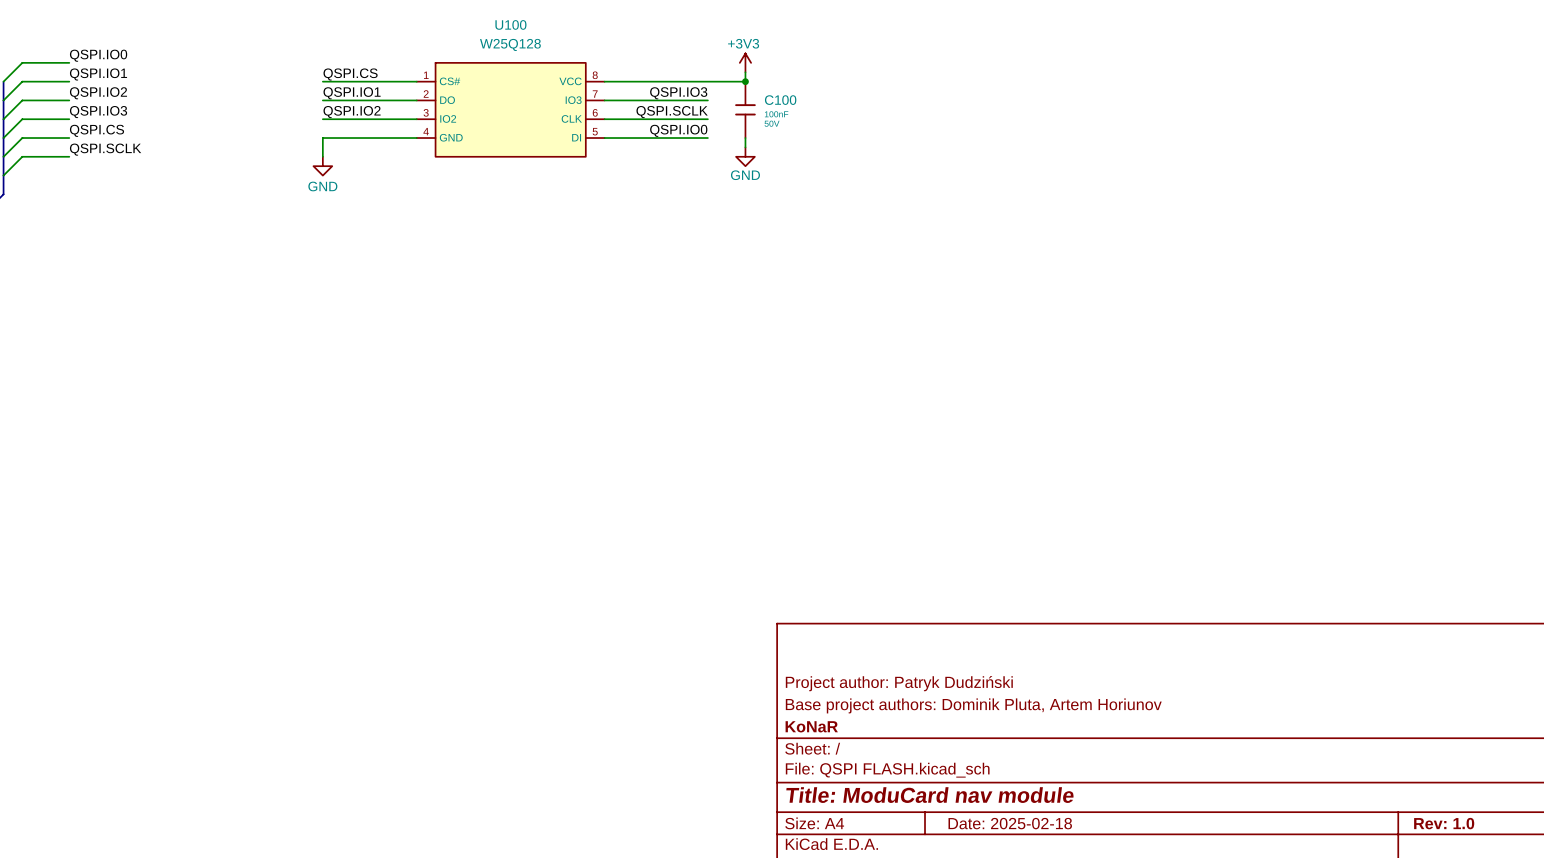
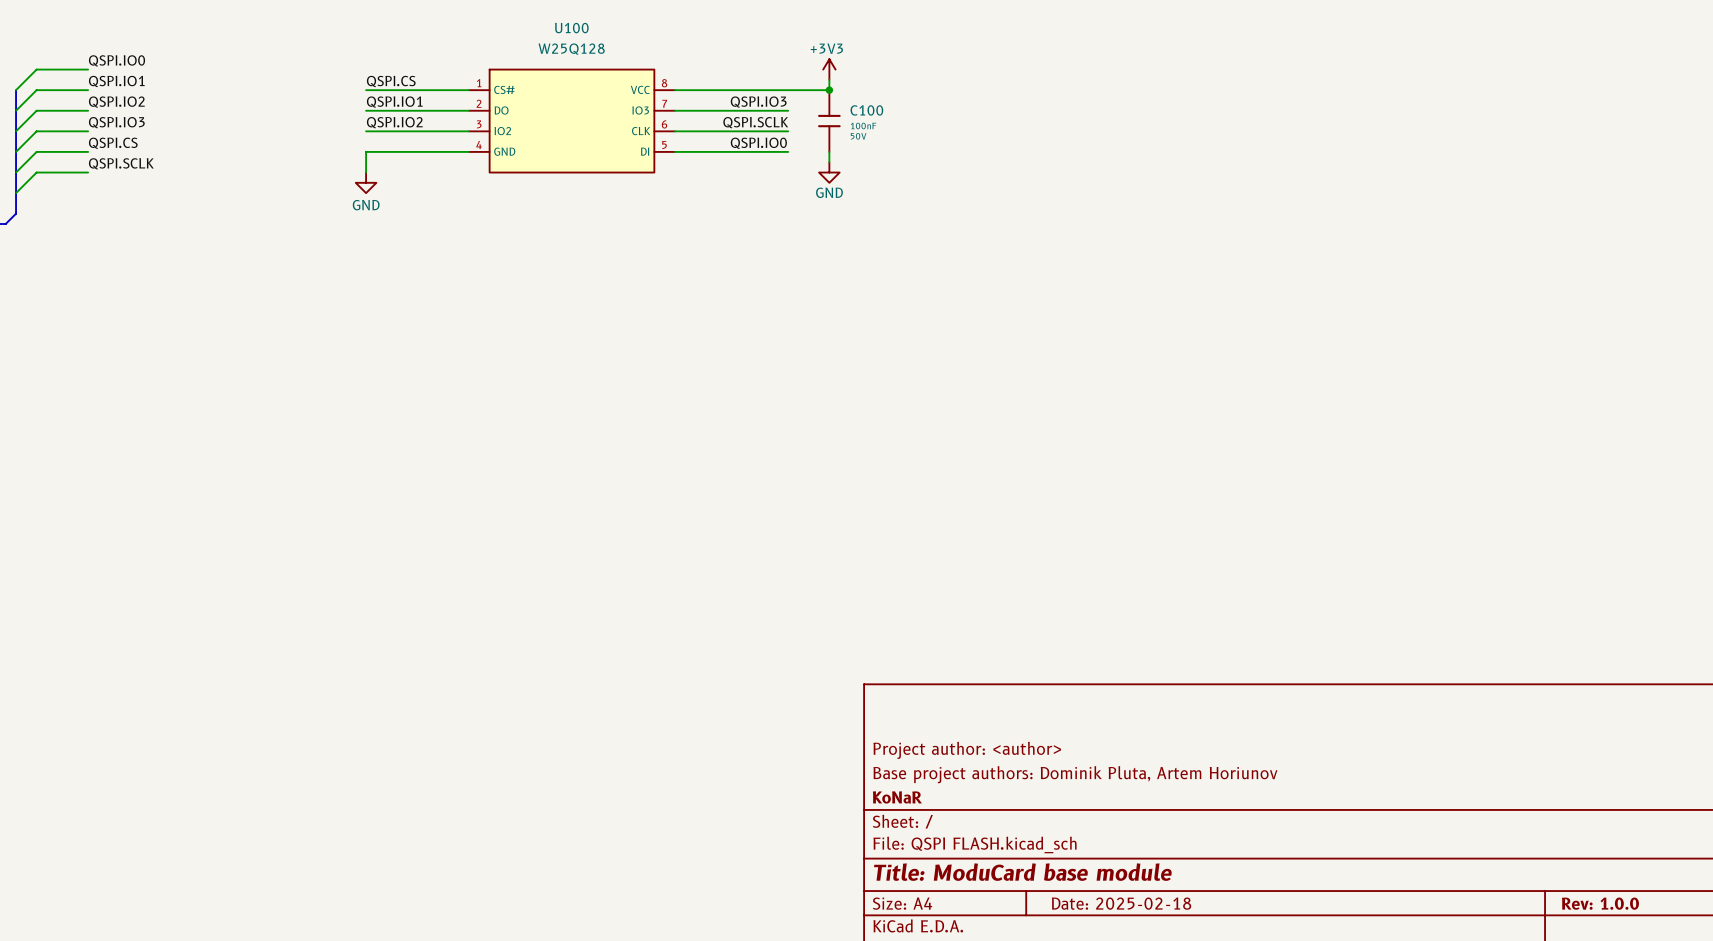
title block: Project author: Patryk Dudziński (899, 683) -> Project author: <author> (967, 750)
title block: Title: ModuCard nav module (930, 795) -> Title: ModuCard base module (1022, 872)
title block: Rev: 1.0 (1444, 823) -> Rev: 1.0.0 (1600, 903)

